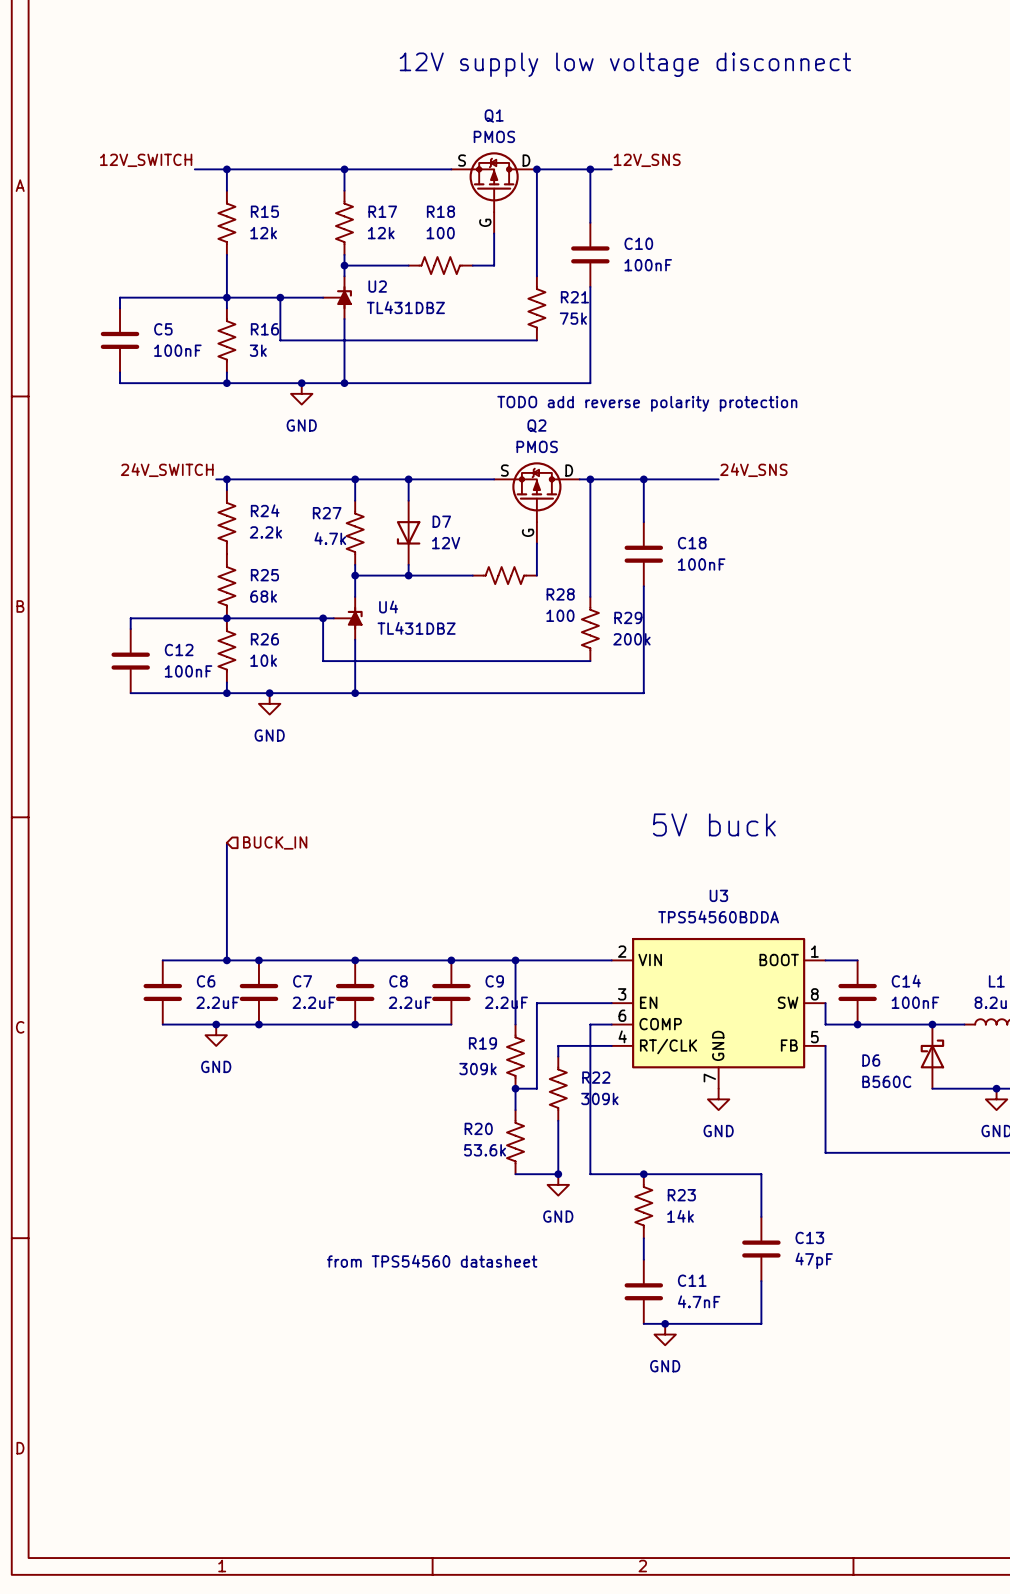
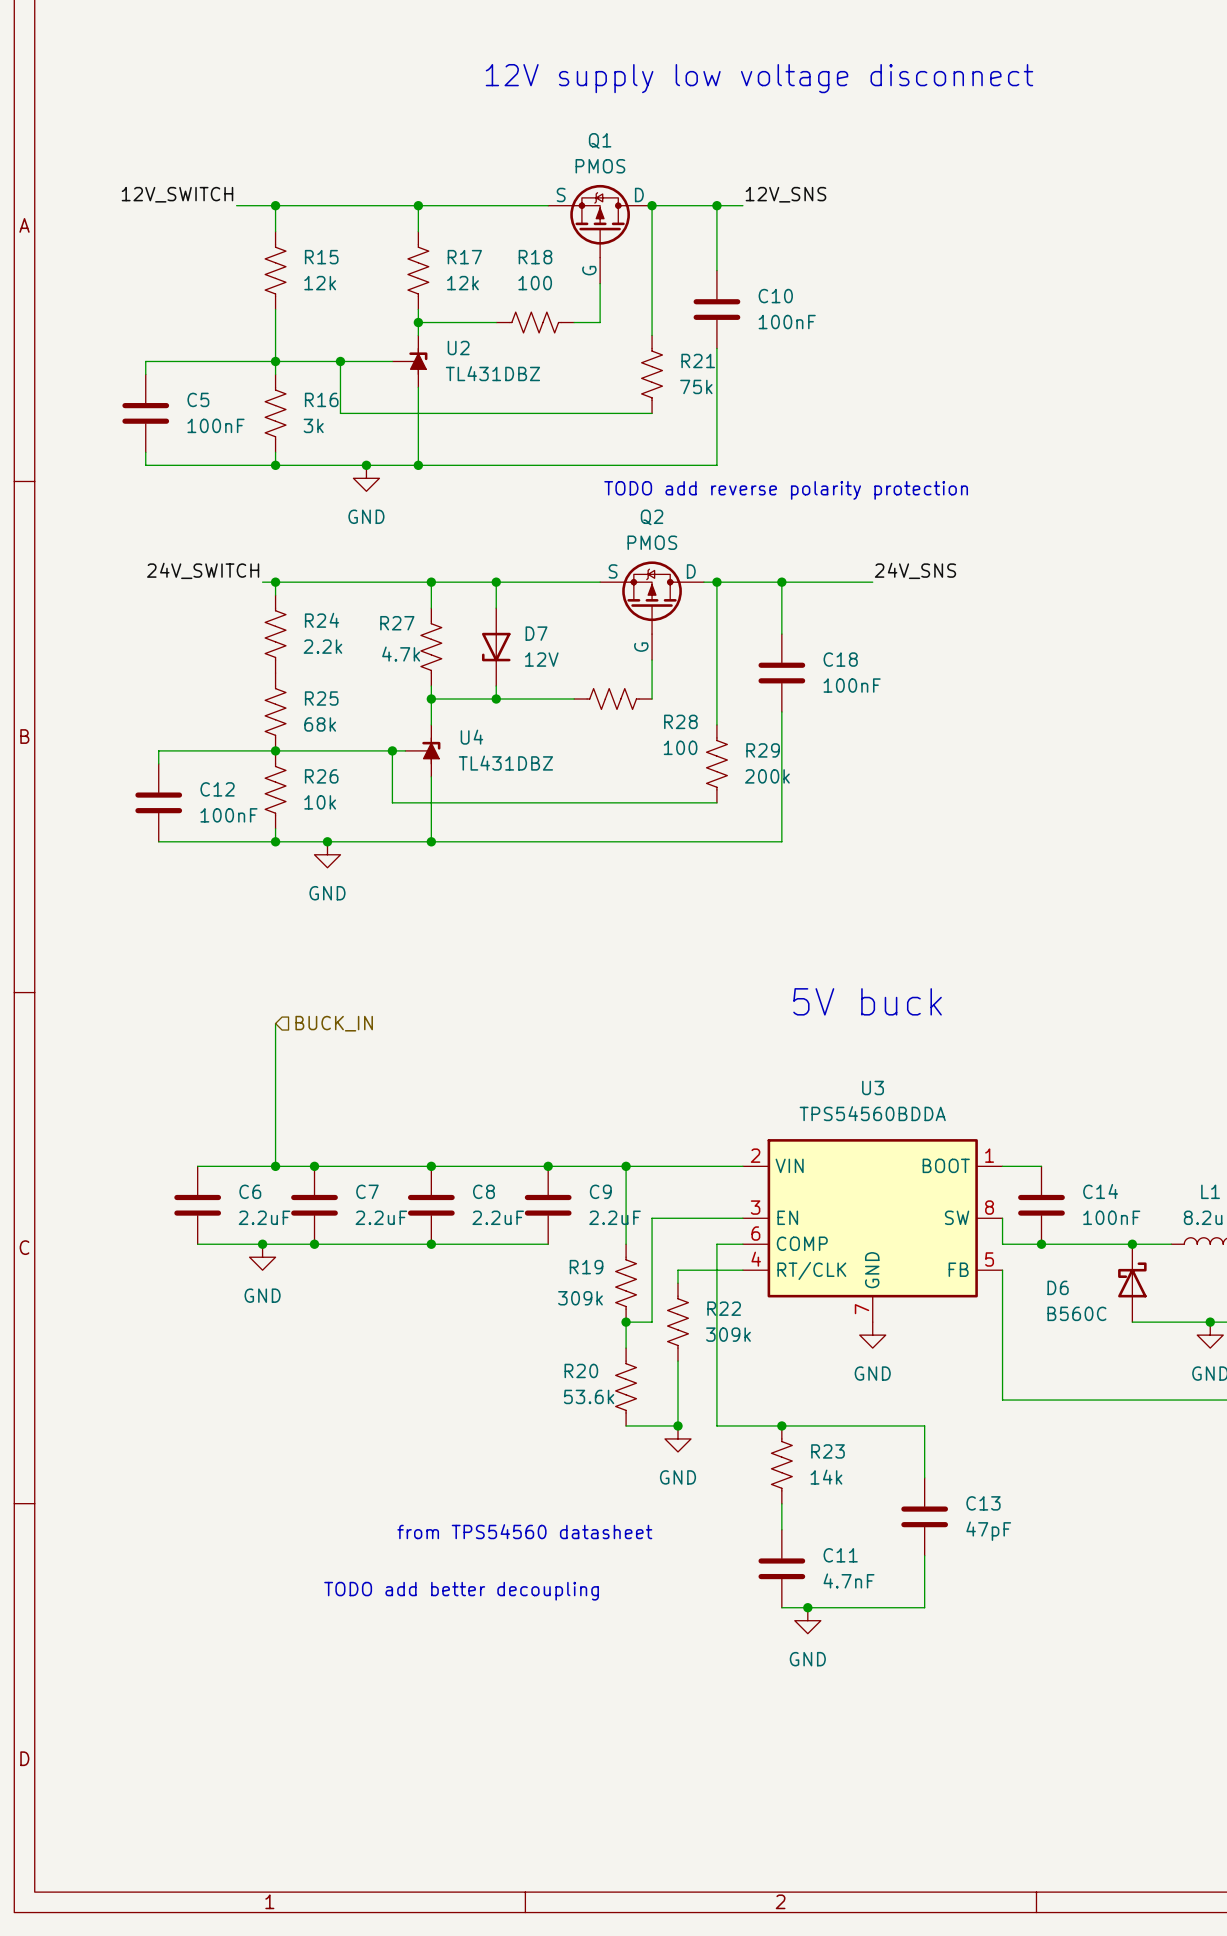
text: none -> TODO add better decoupling (461, 1591)

